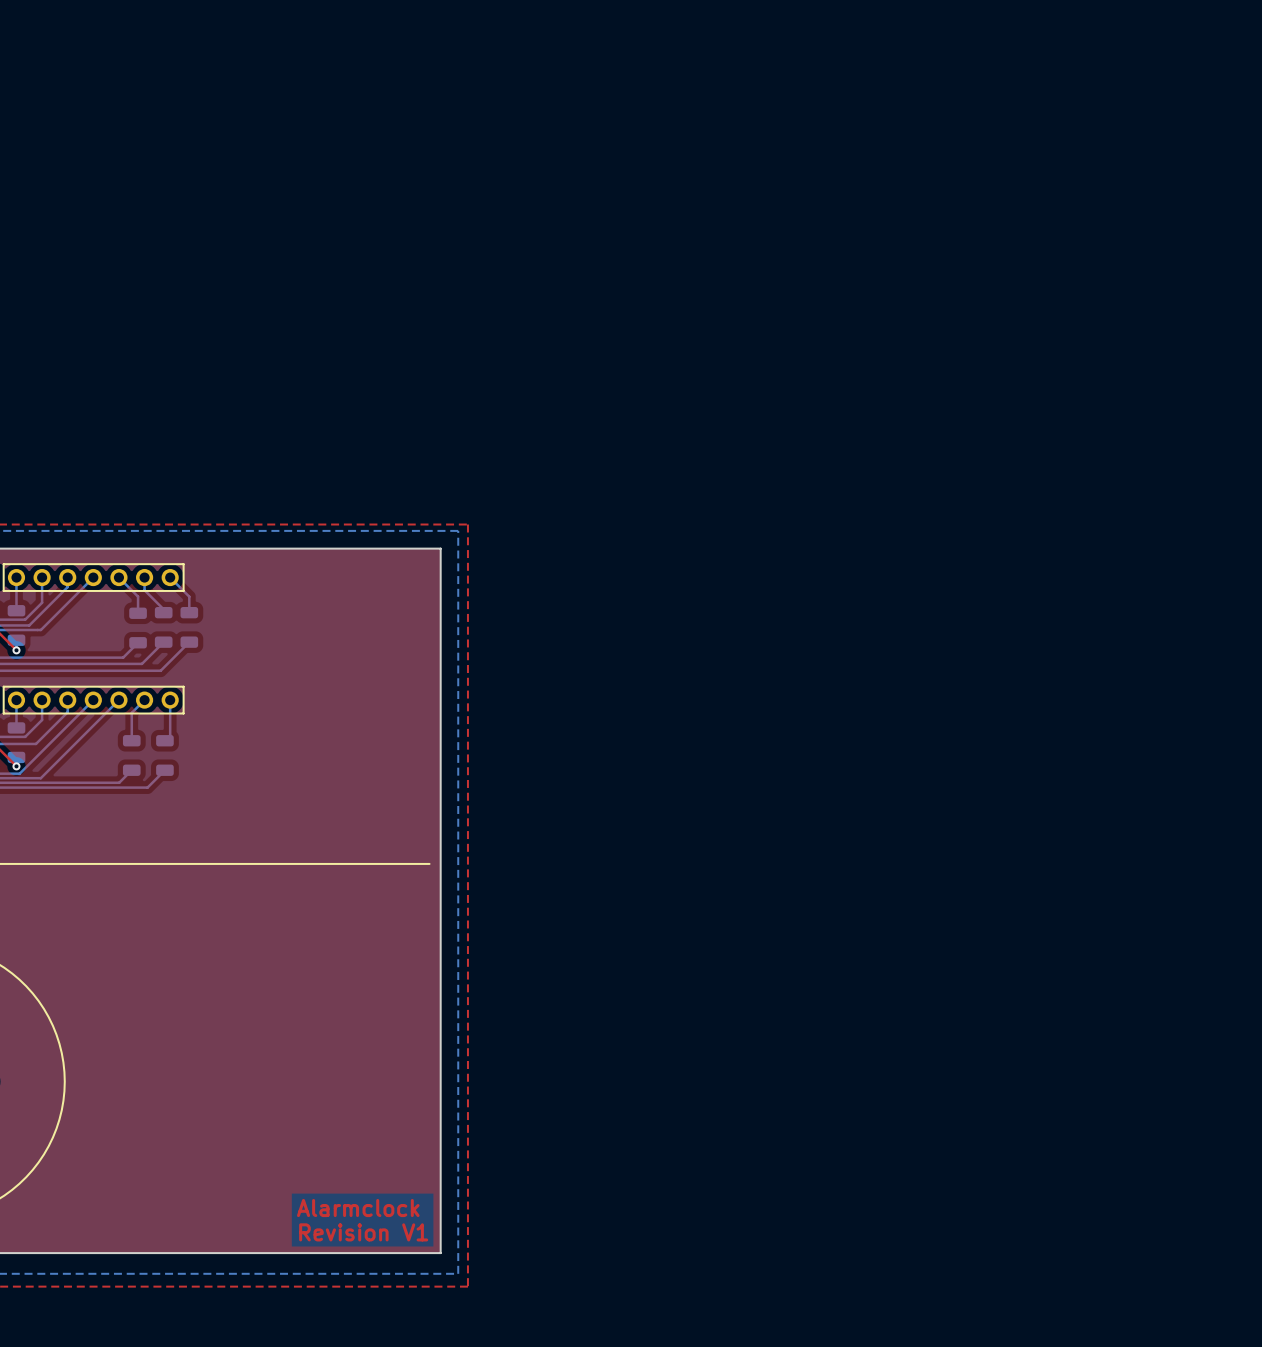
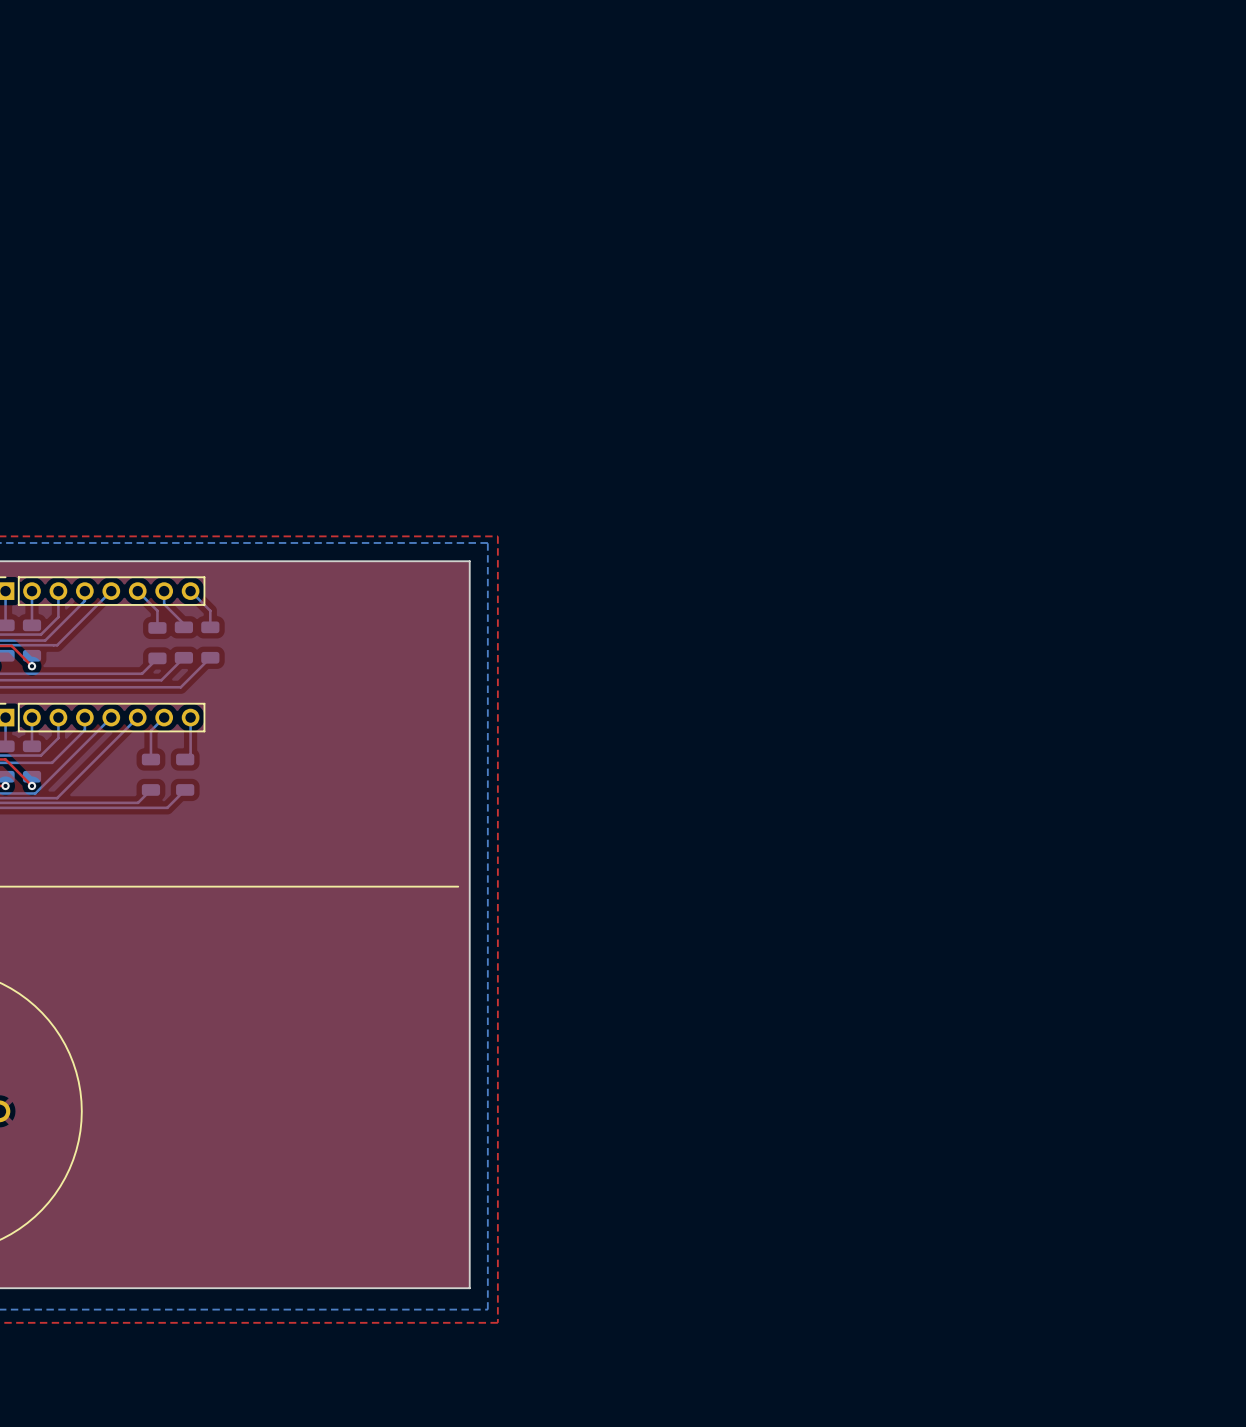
text: Alarmclock (358, 1208) -> none
text: Revision V1 (363, 1232) -> none

